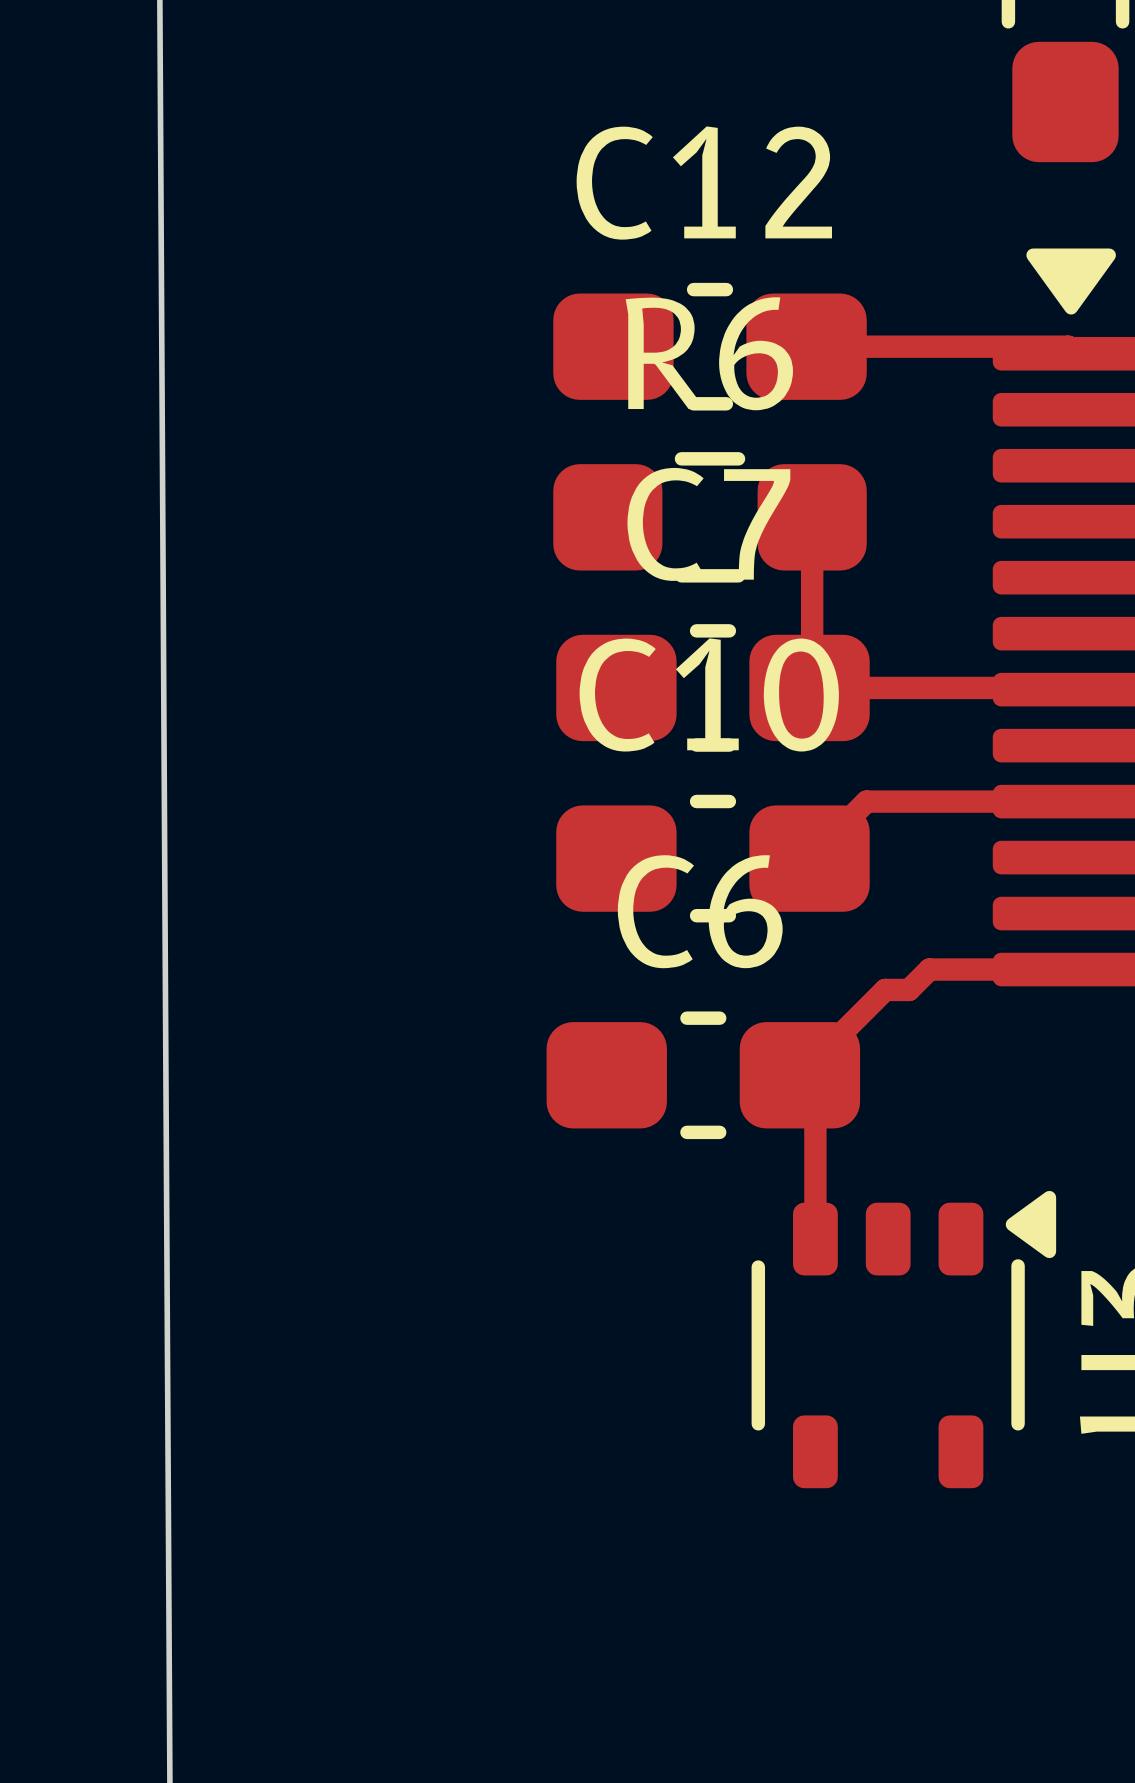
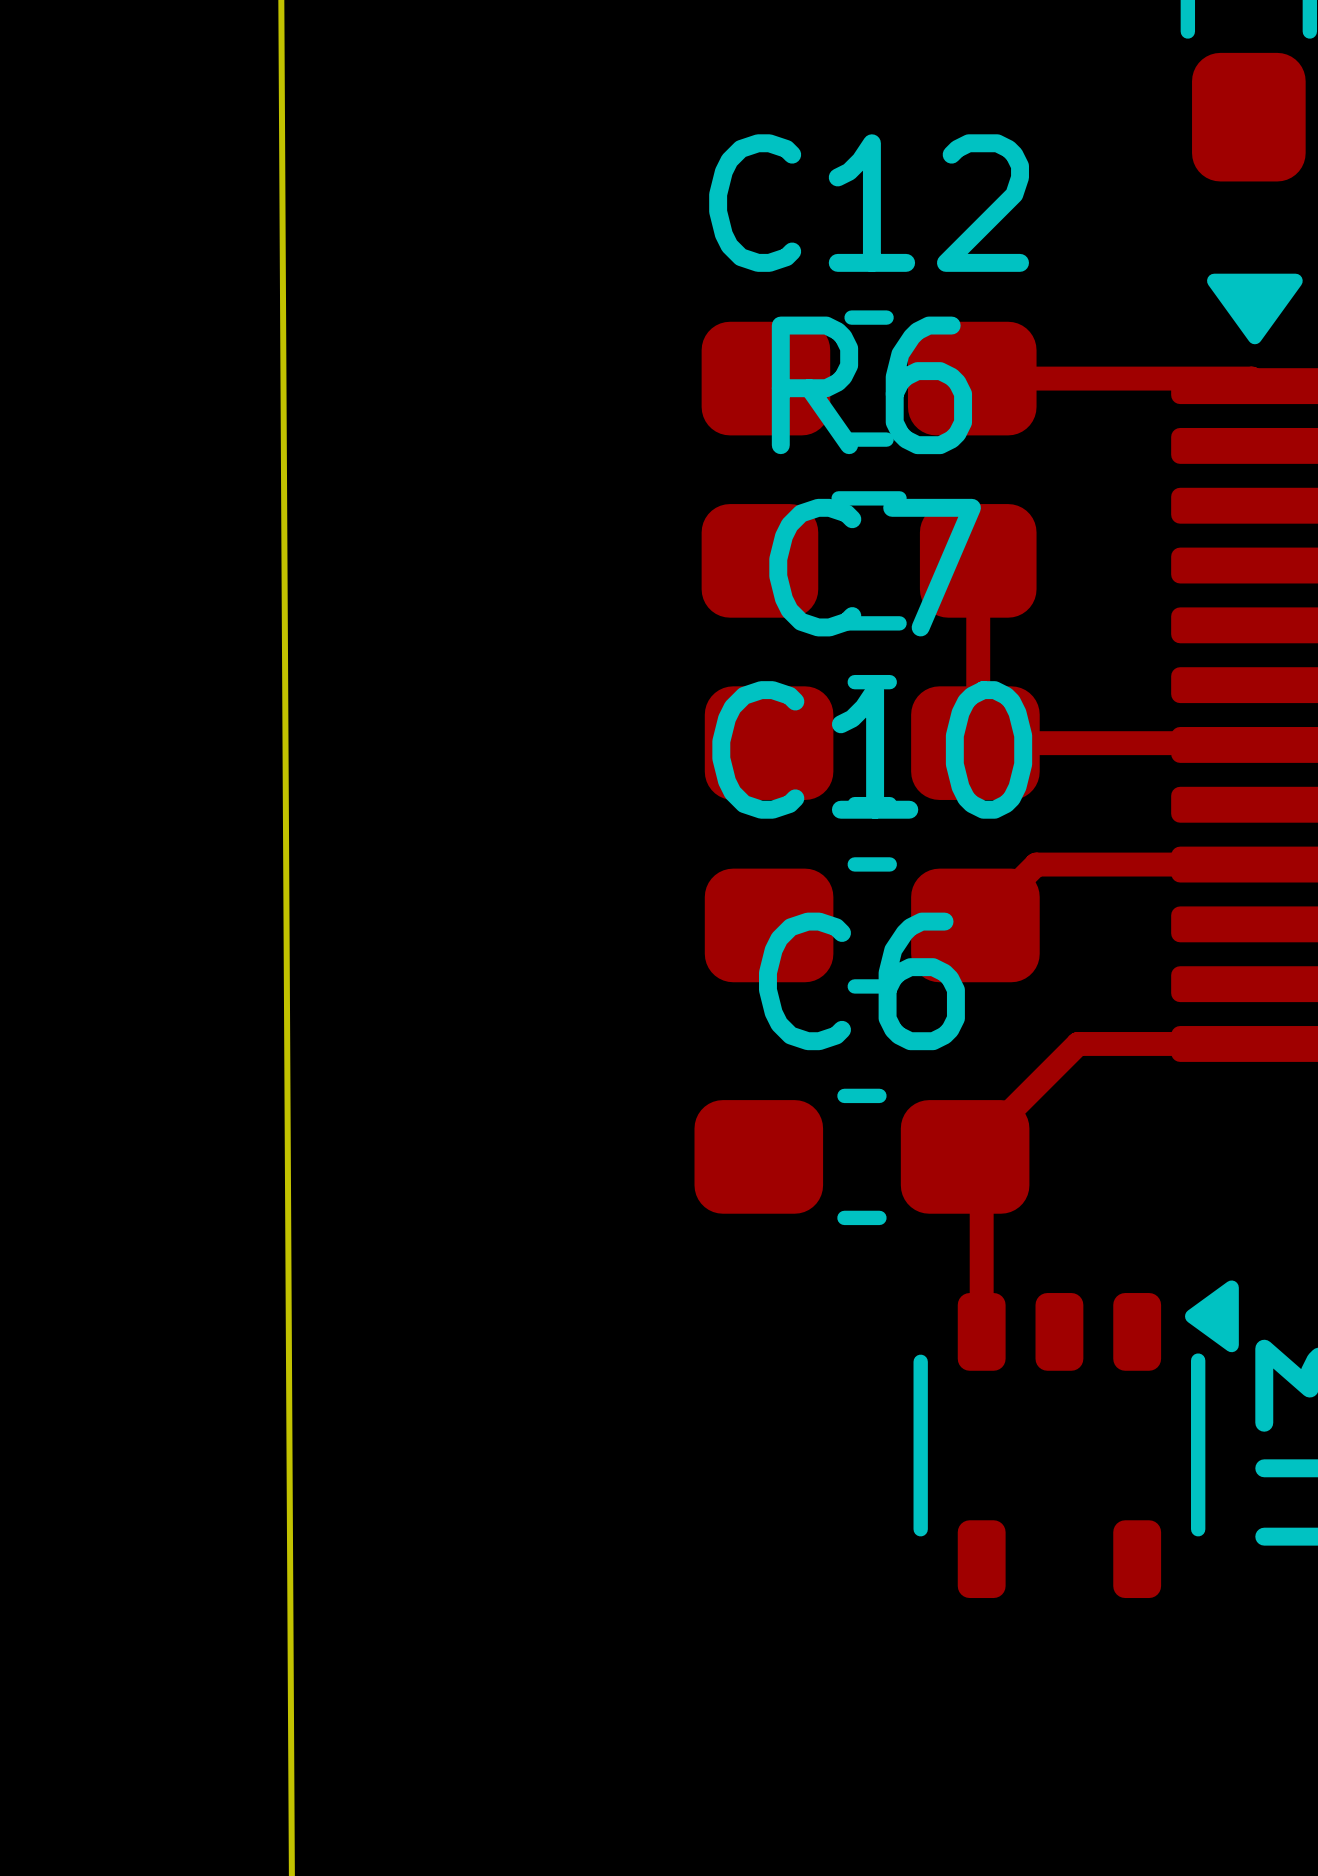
track: (929, 969) (909, 989) (885, 989) -> (1103, 1043) (1078, 1043) (1056, 1065)

